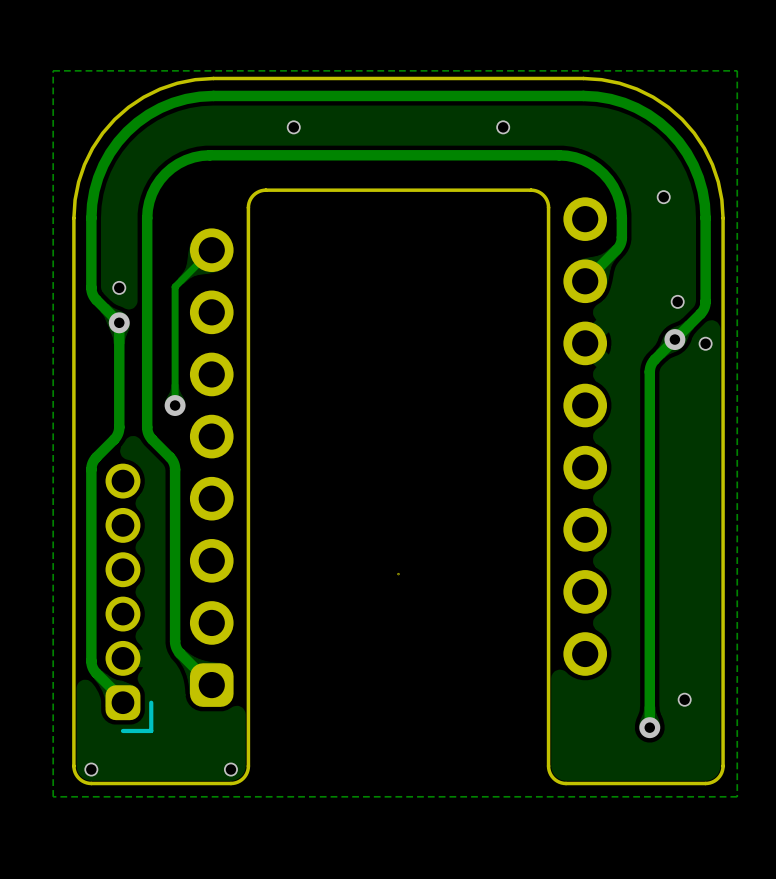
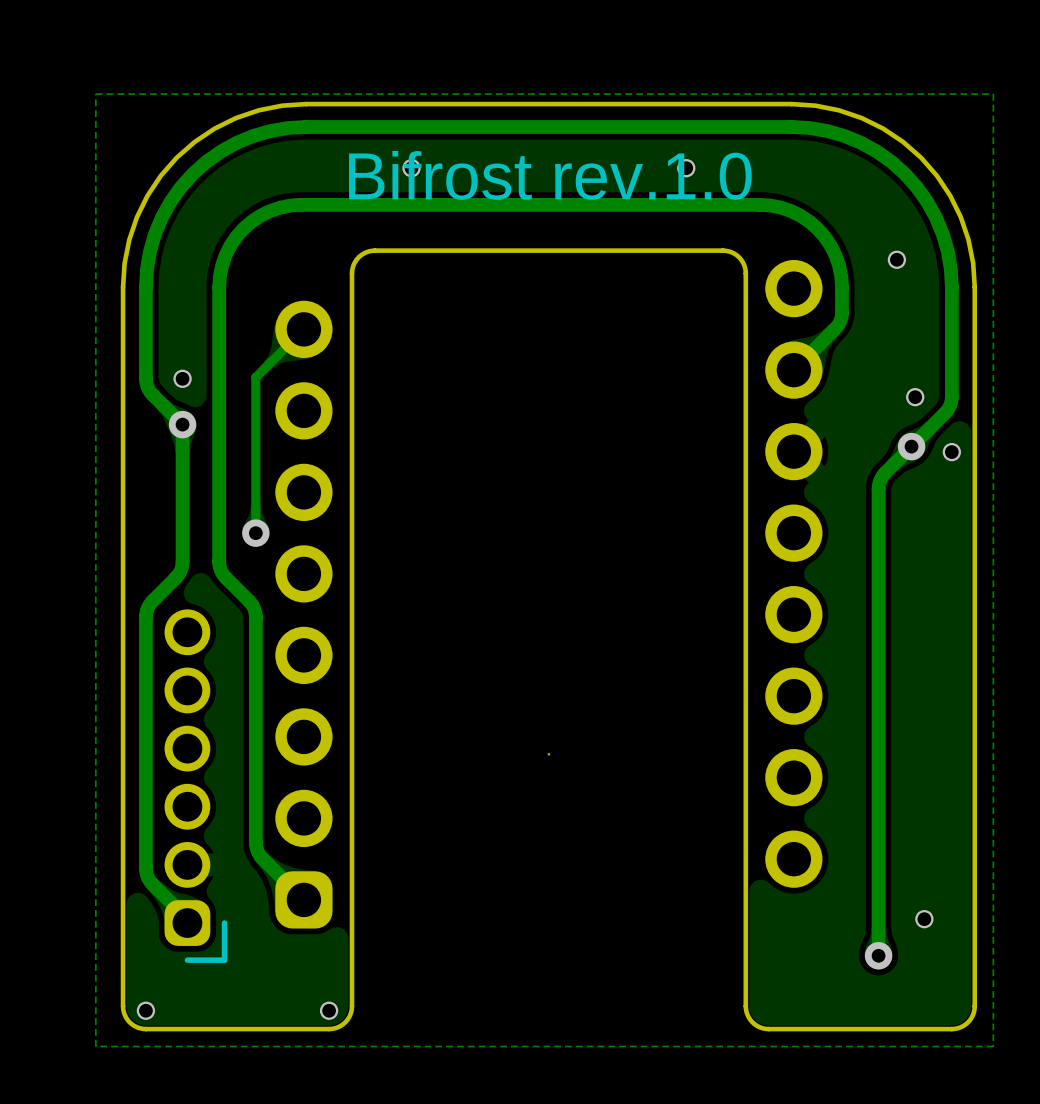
text: none -> Bifrost rev.1.0 (550, 175)

